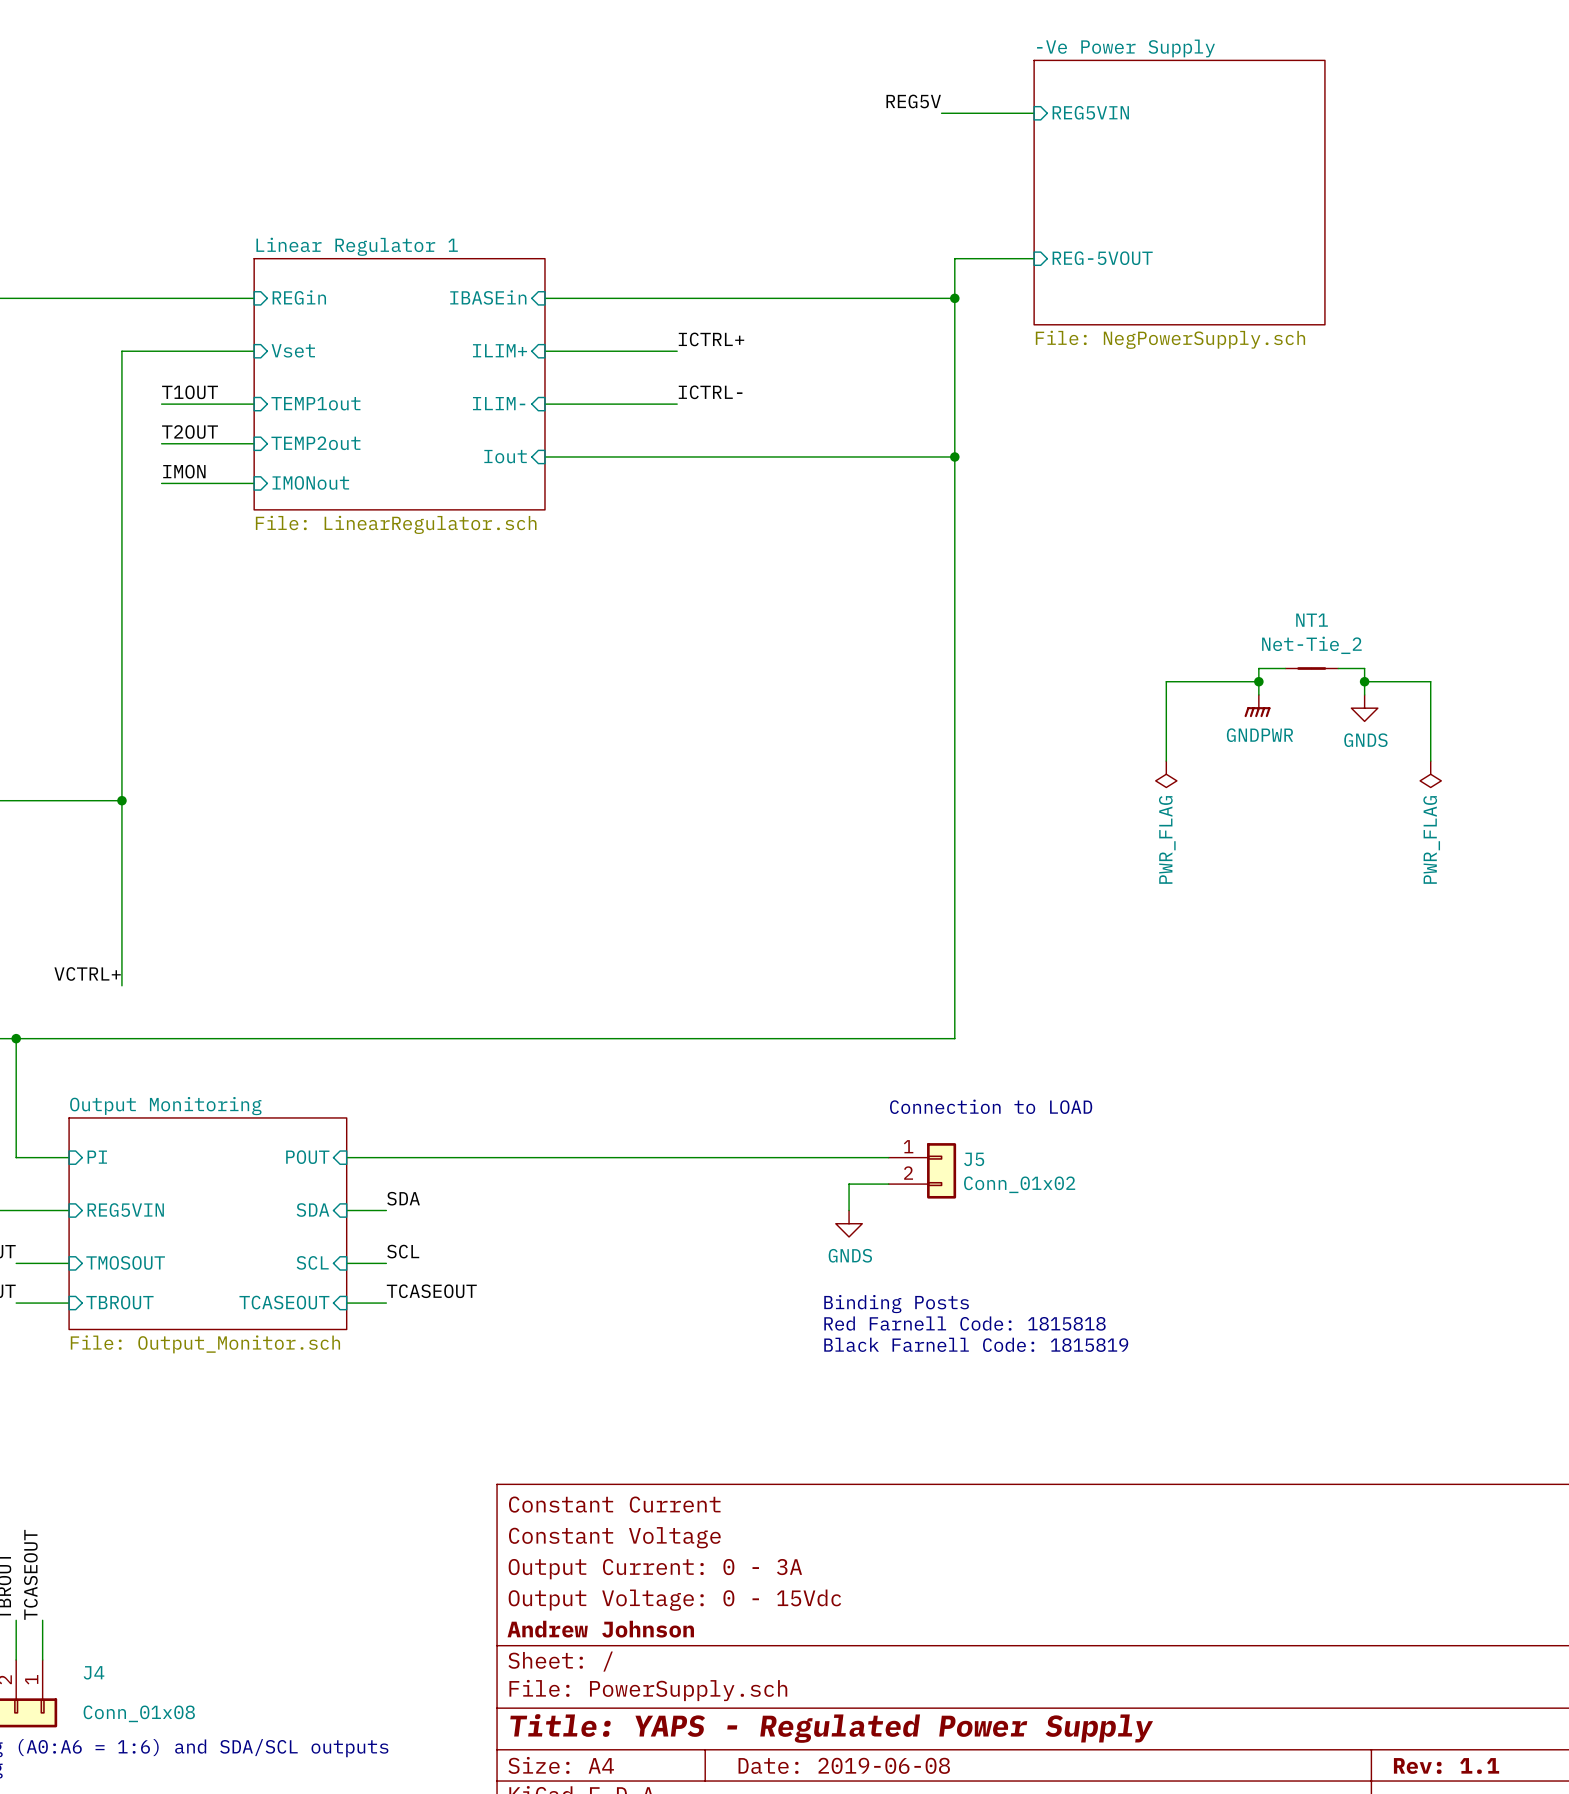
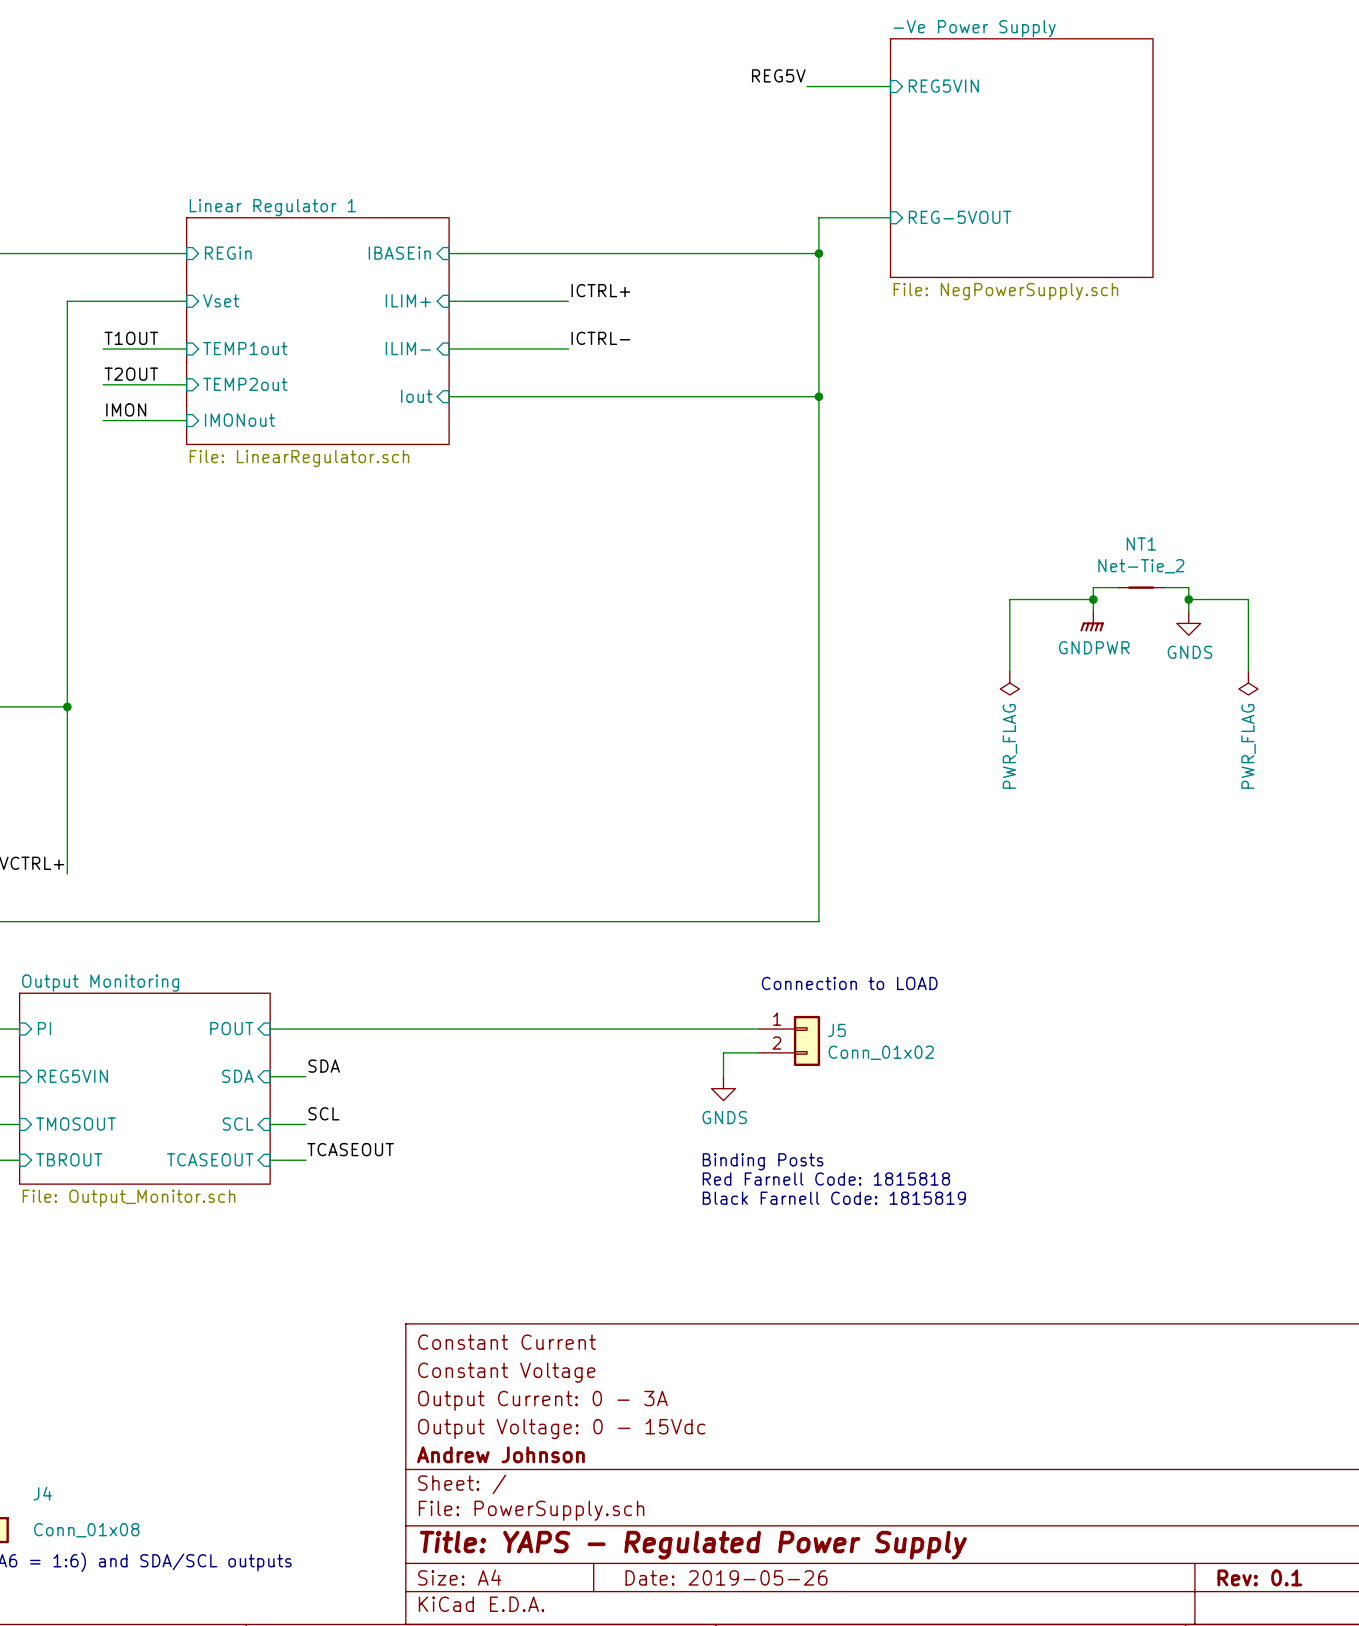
title block: Date: 2019-06-08 (844, 1765) -> Date: 2019-05-26 (726, 1577)
title block: Rev: 1.1 (1446, 1765) -> Rev: 0.1 (1259, 1577)

